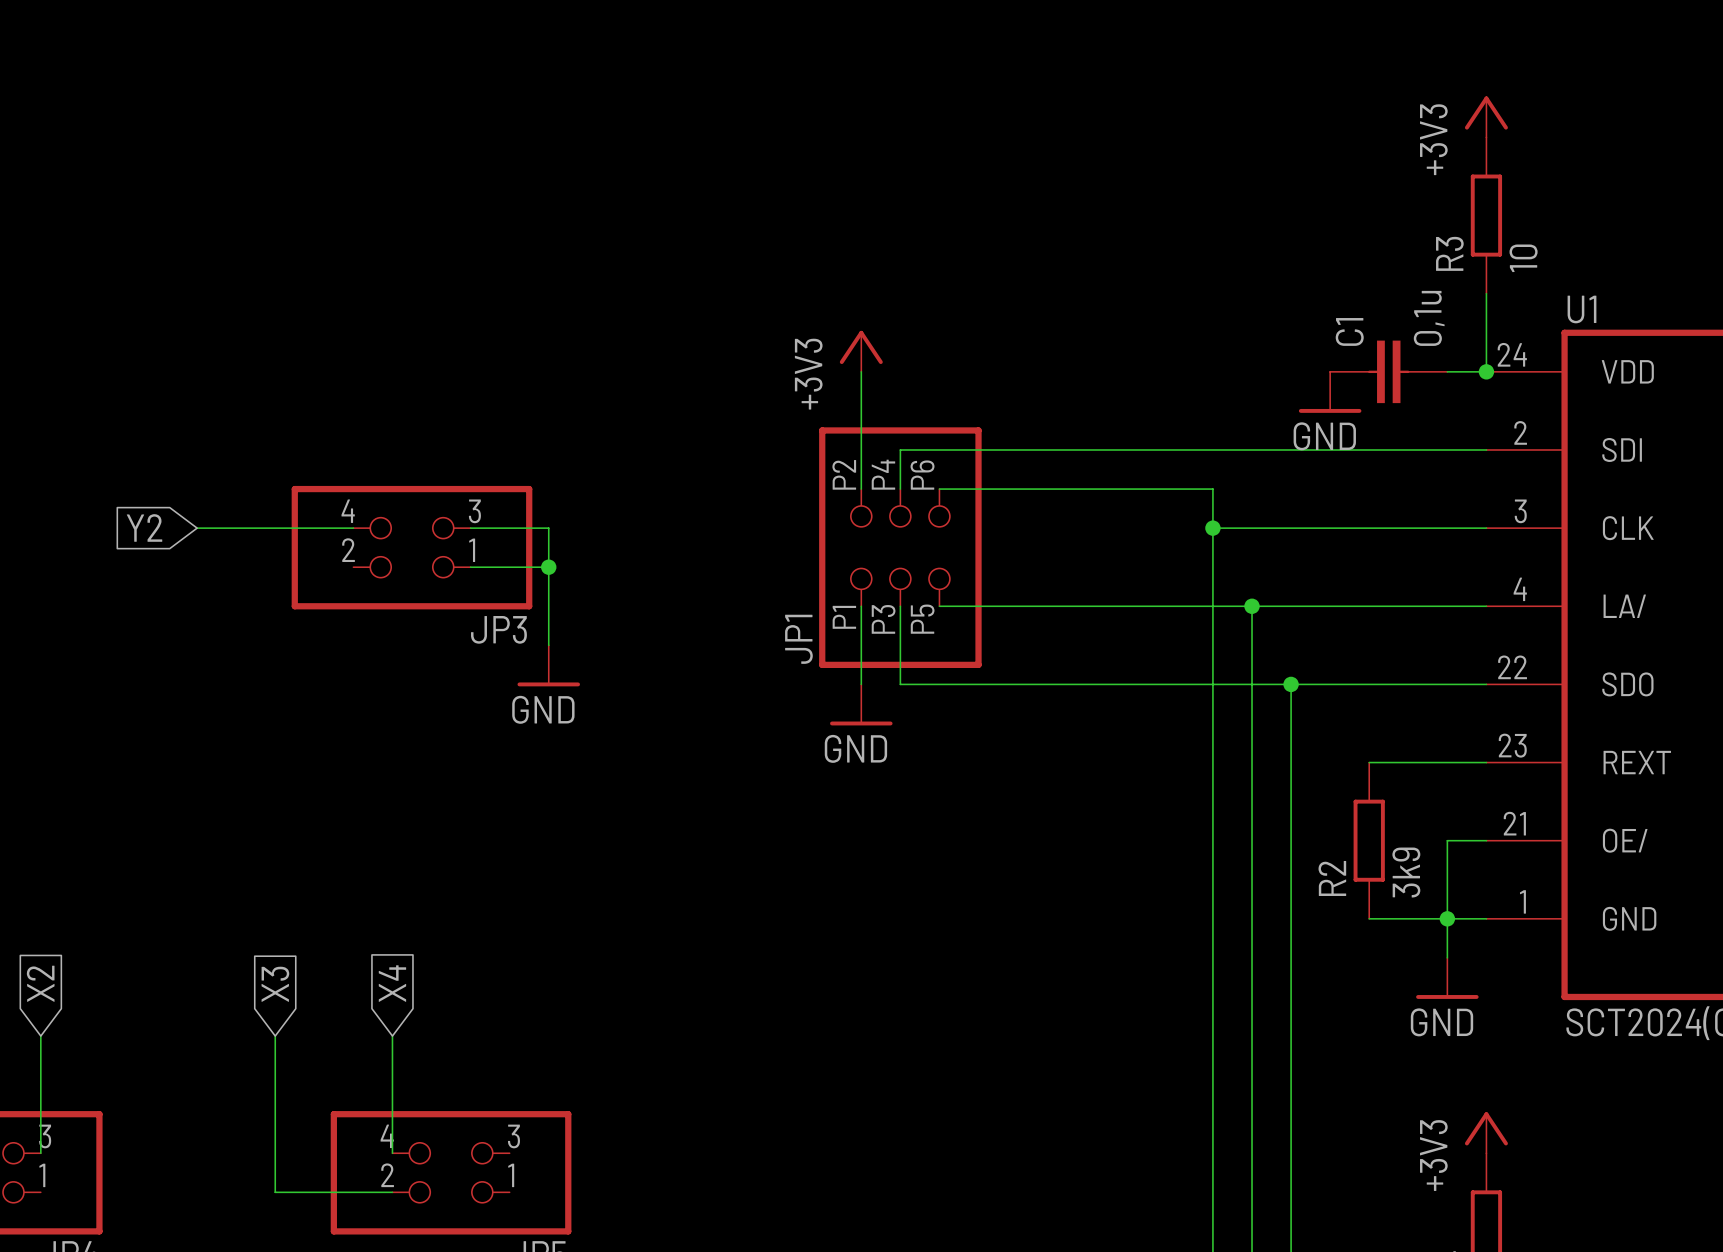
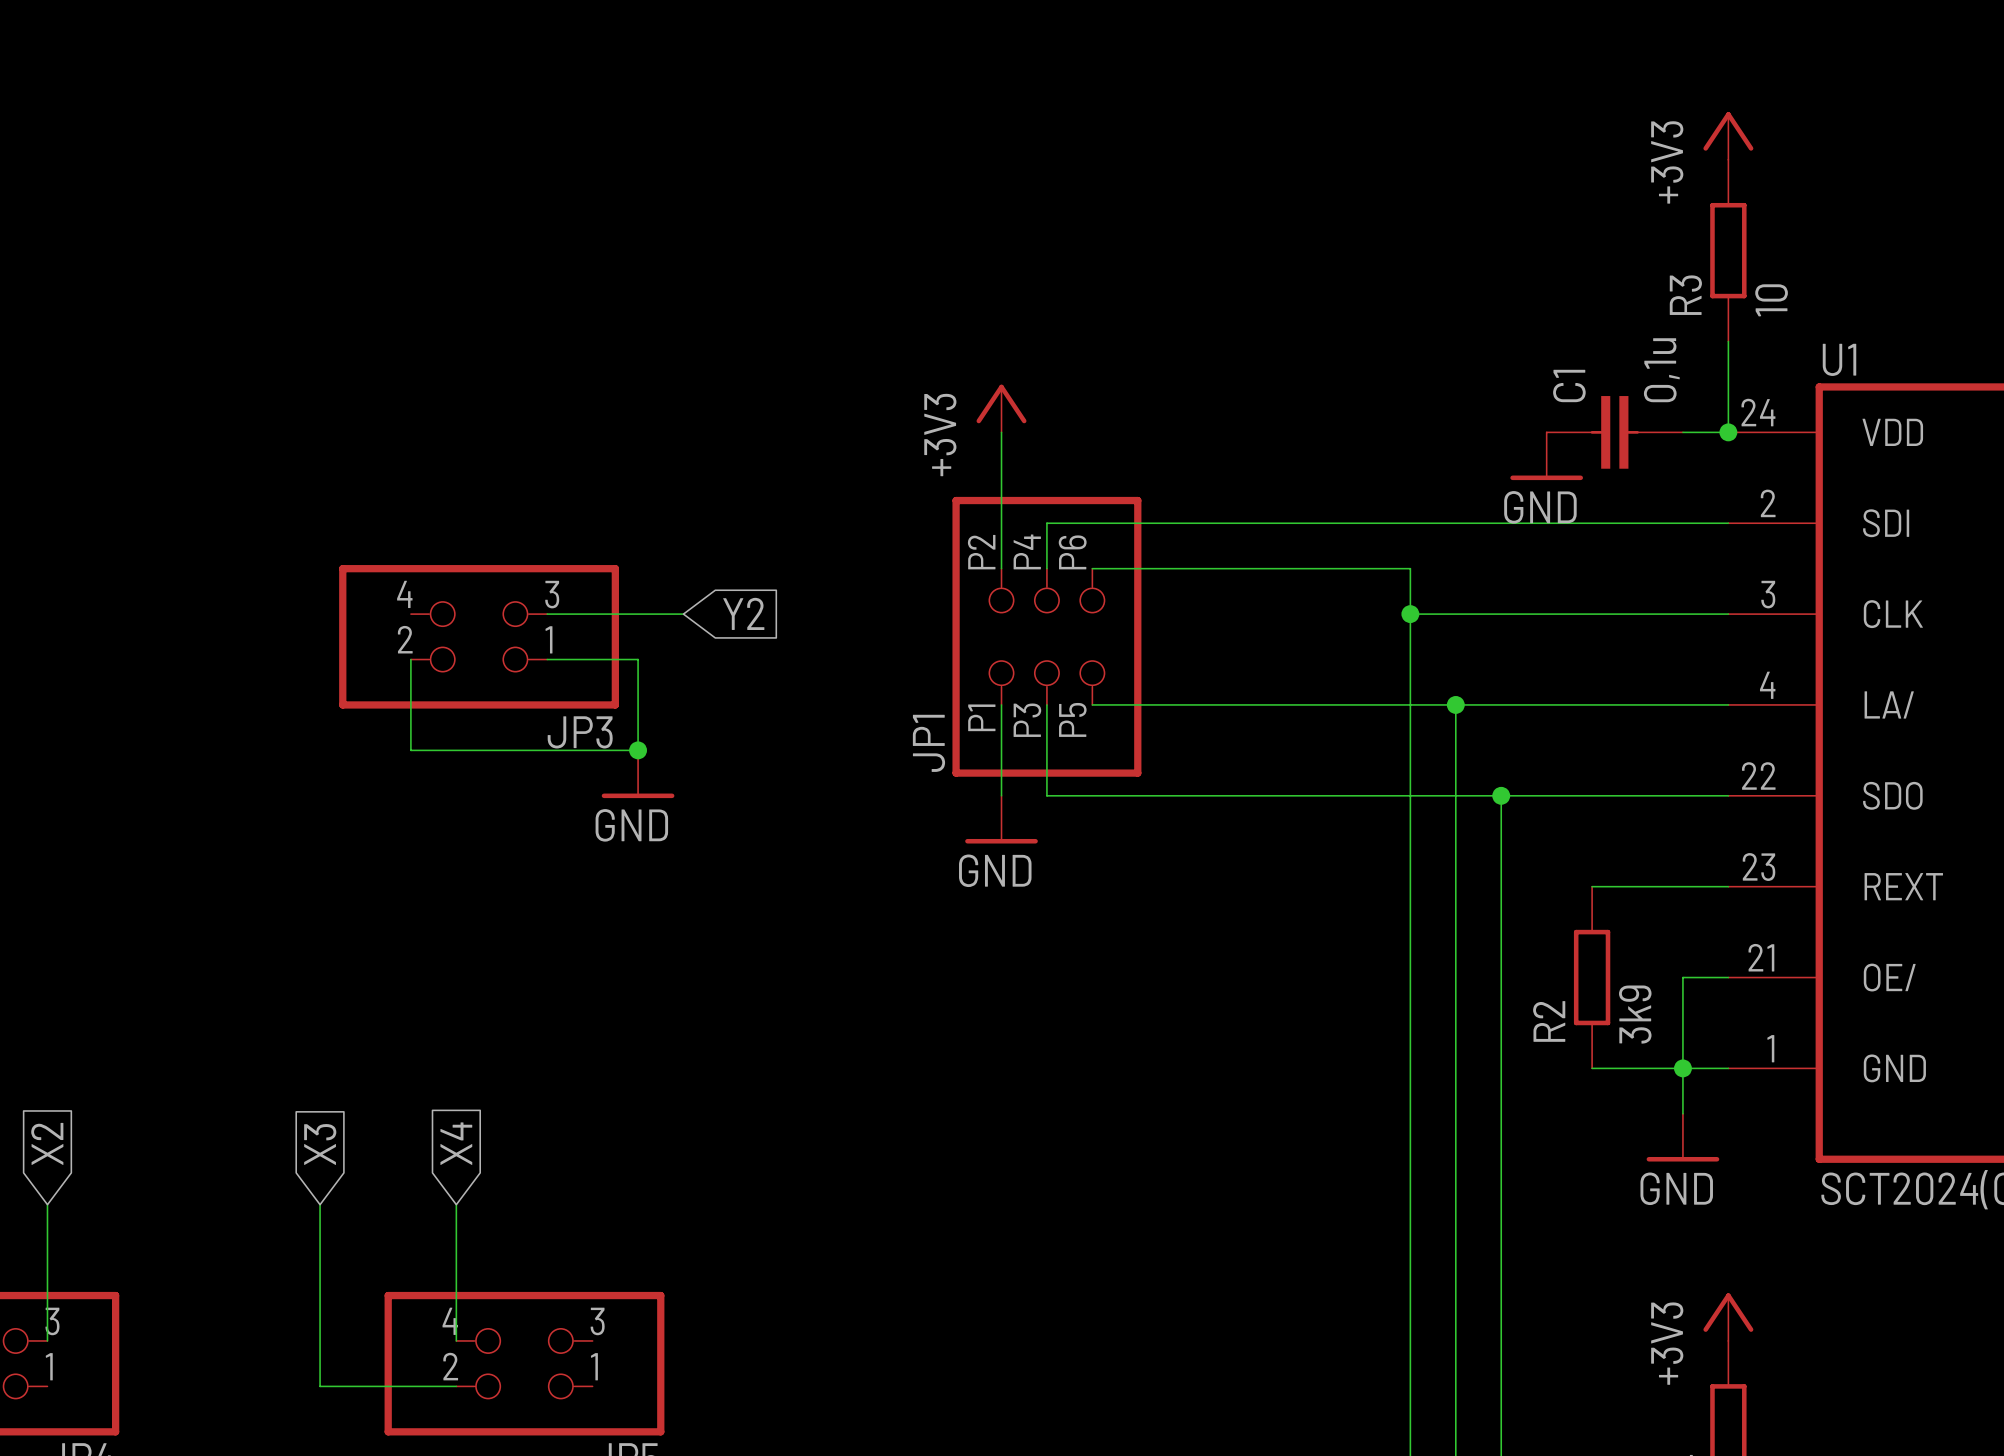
global label: Y2 (144, 527) -> none
global label: none -> Y2 (743, 613)
wire: (197, 528) (353, 528) -> none
wire: (548, 528) (548, 567) -> (638, 614) (683, 614)
wire: none -> (410, 659) (410, 750) (638, 750)
junction position: (548, 567) -> (638, 750)

